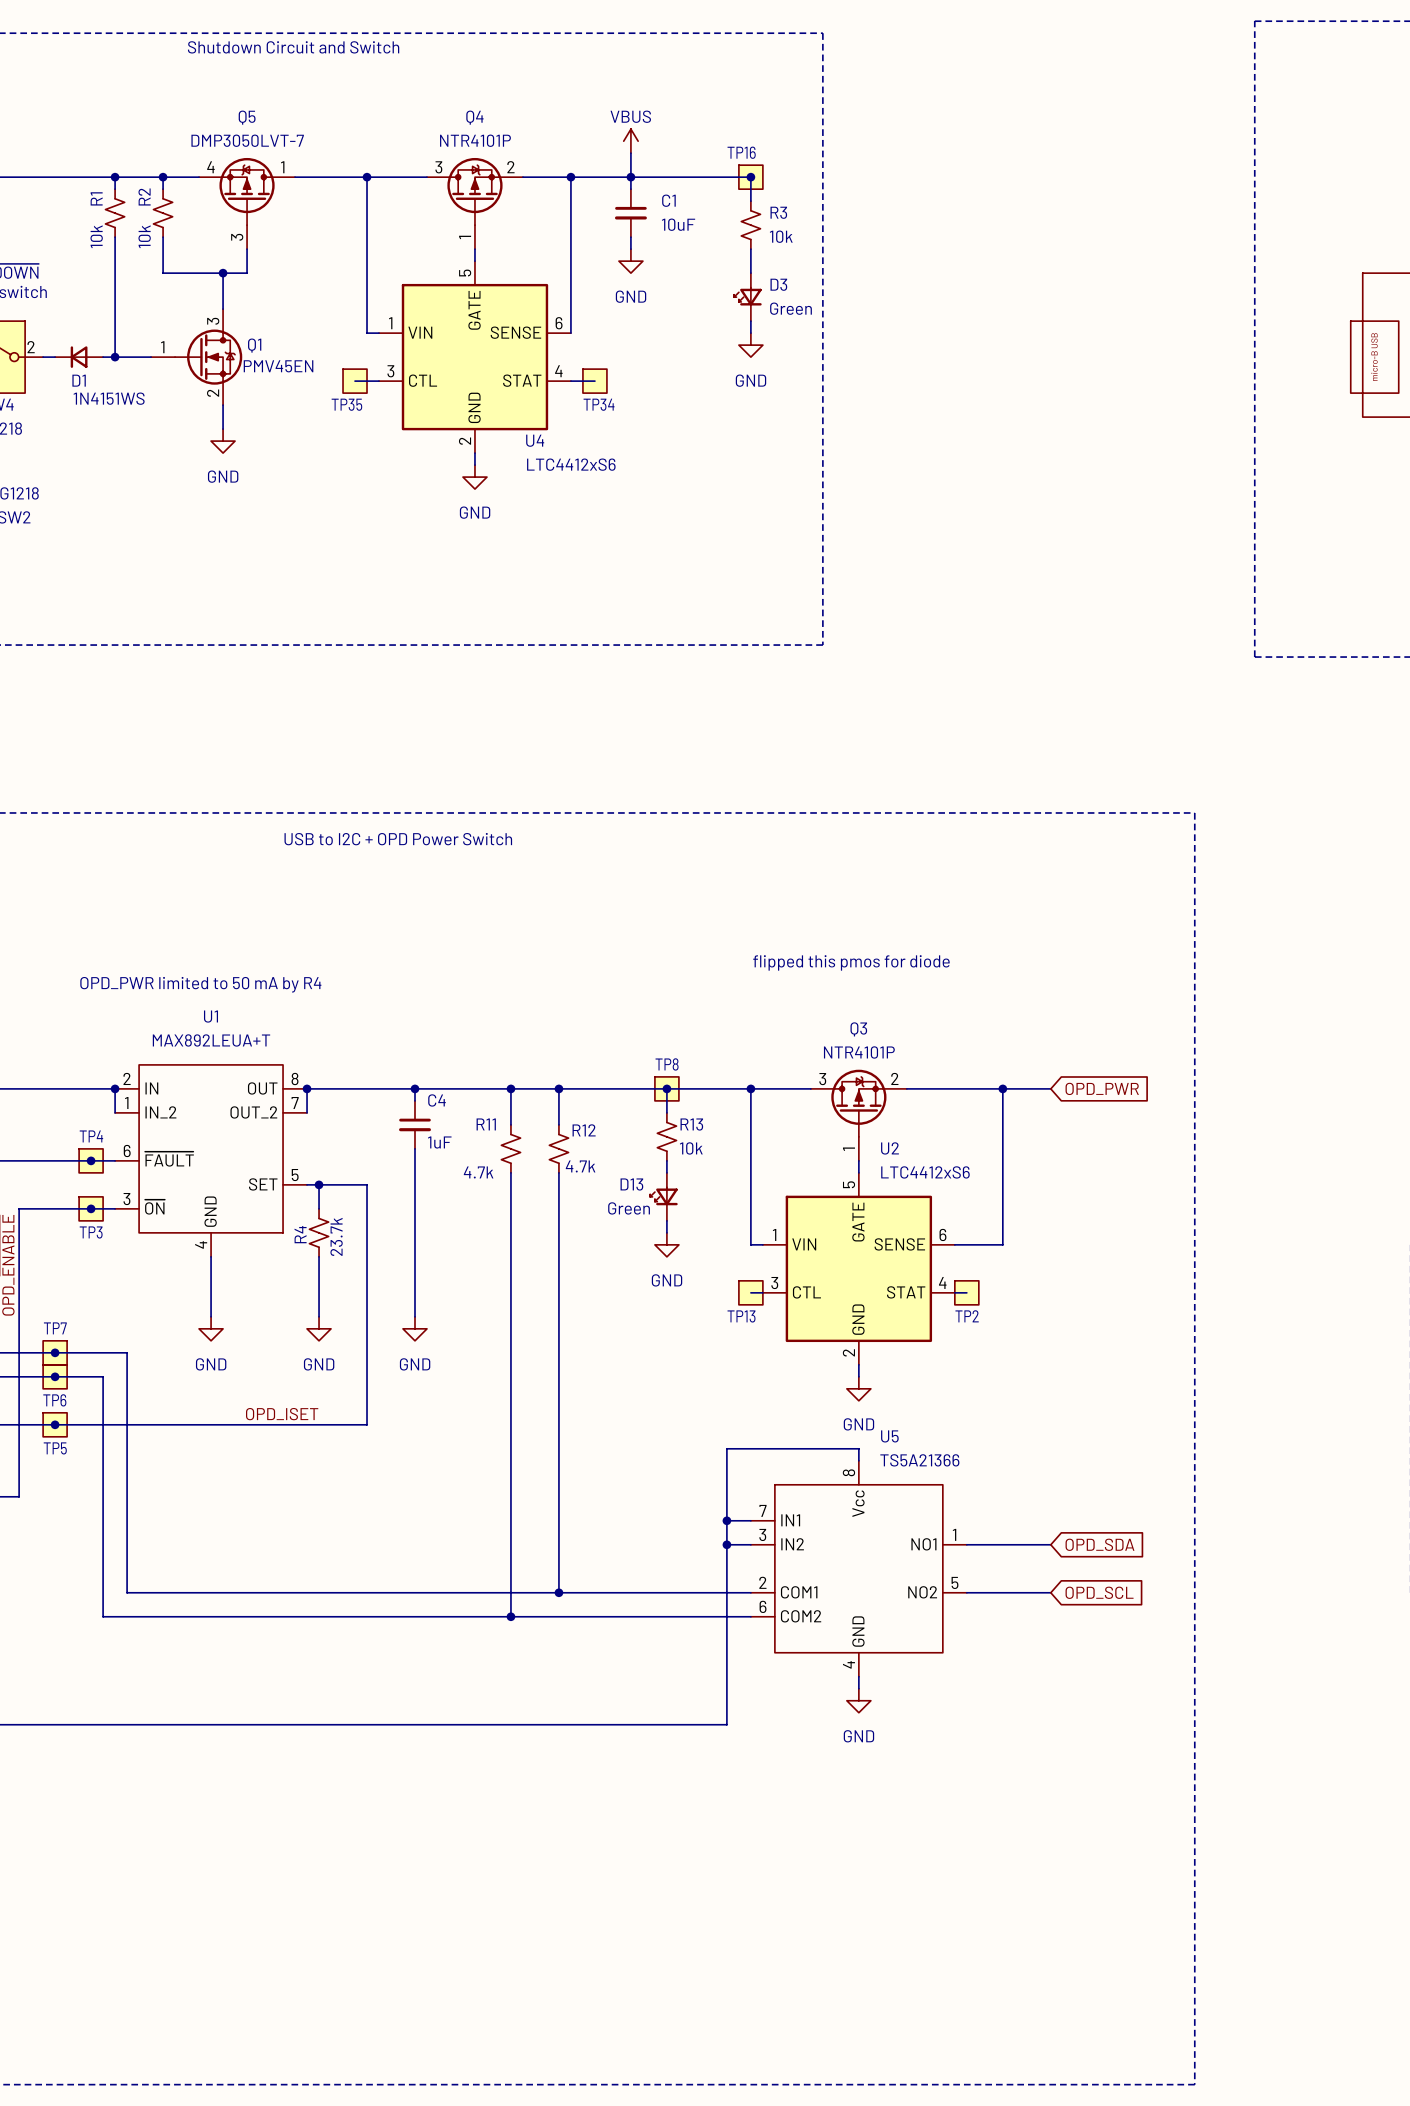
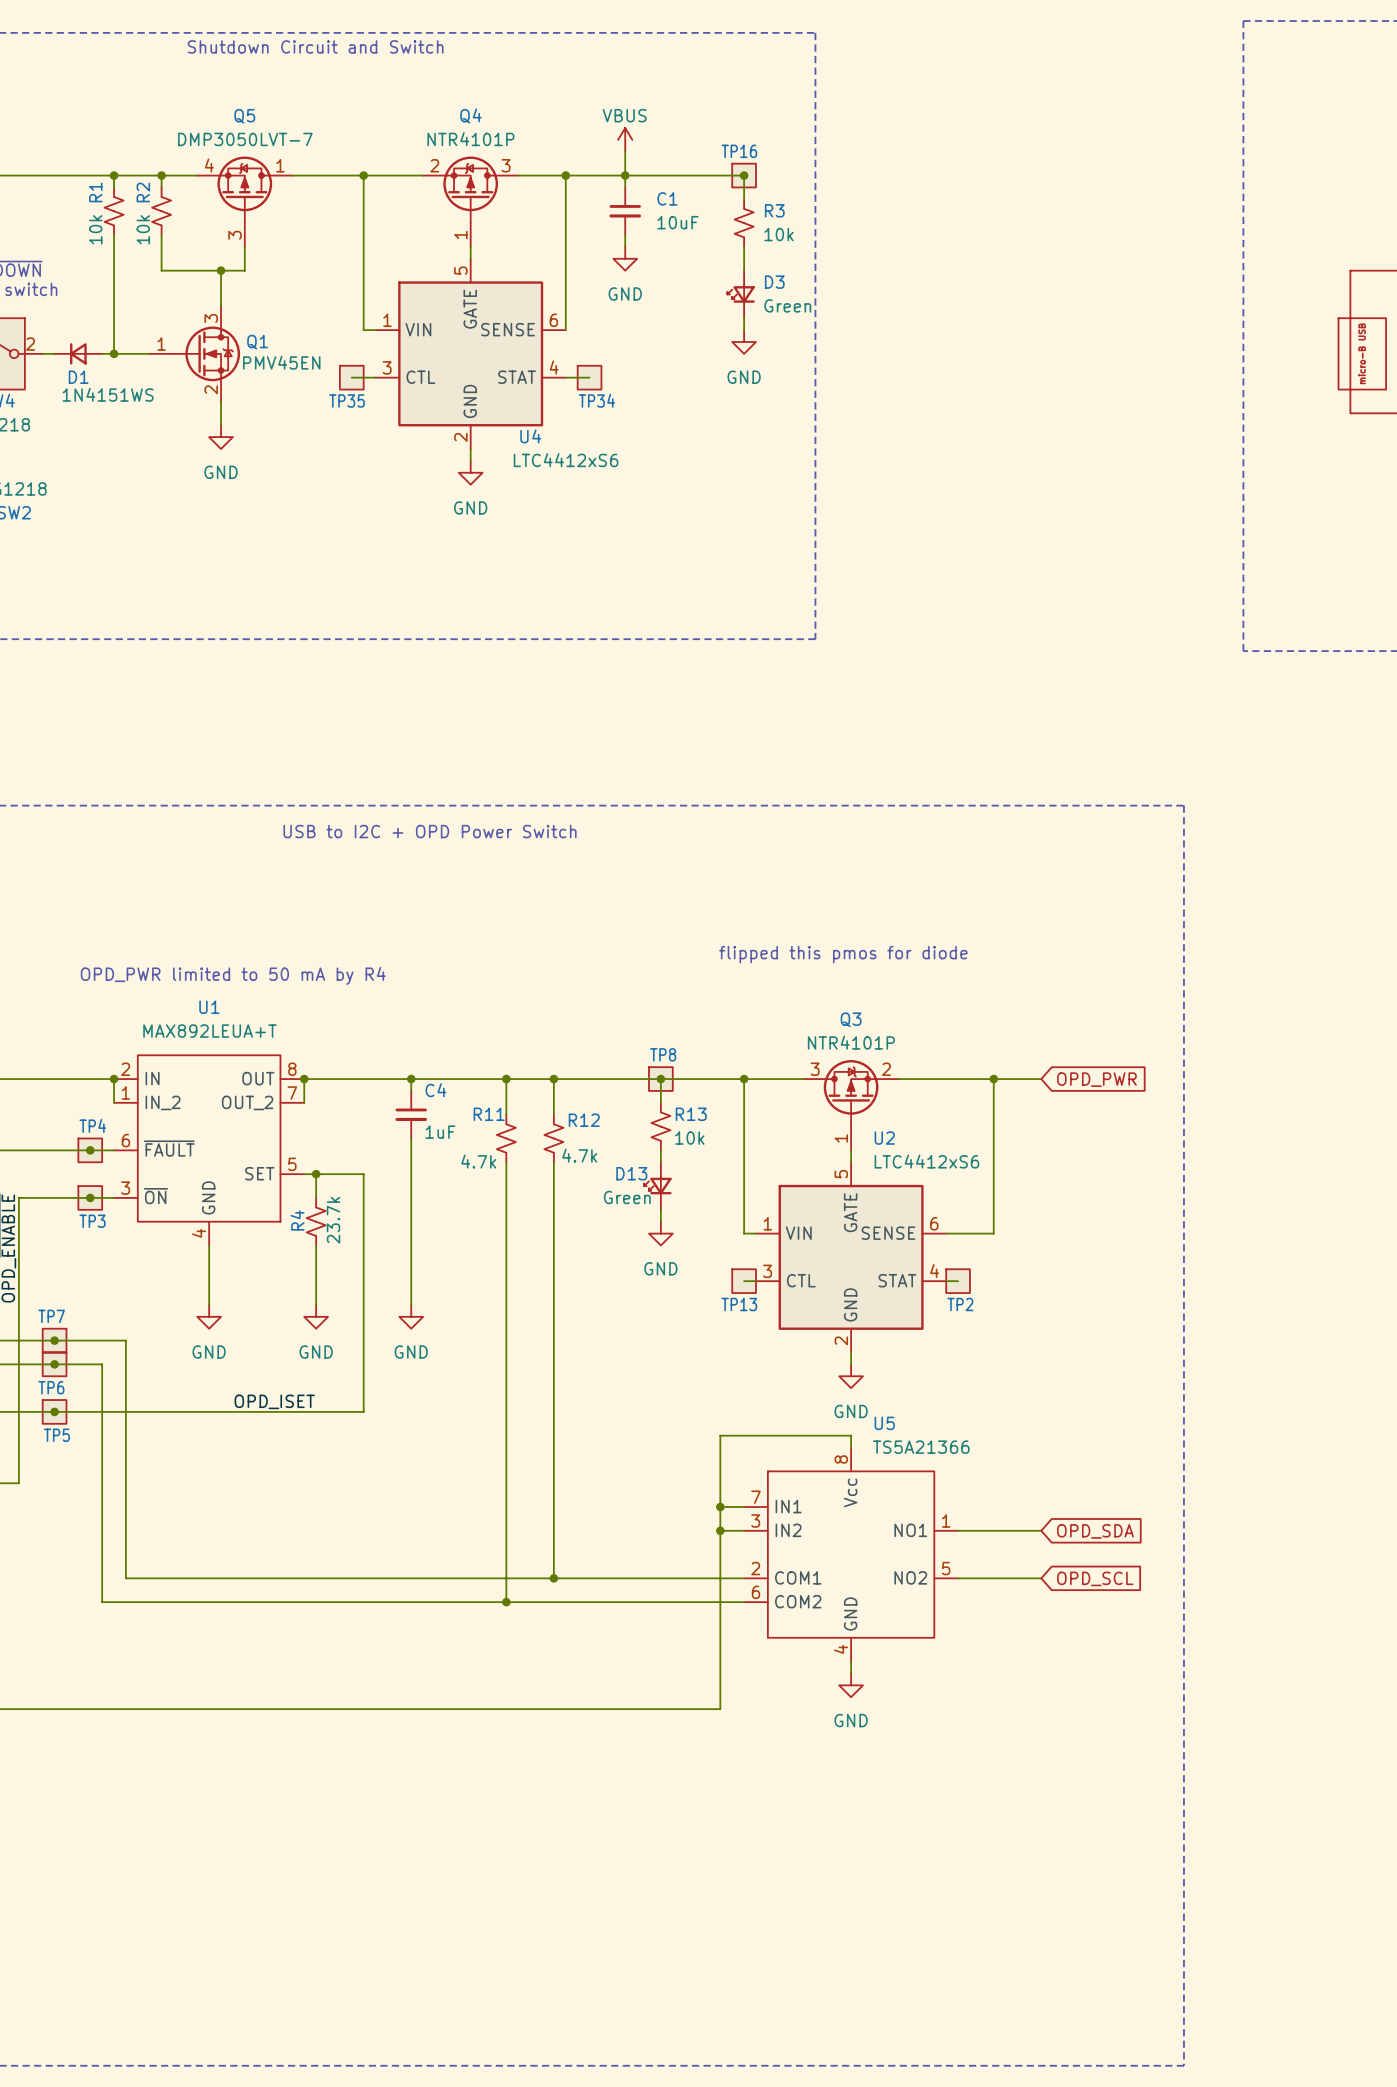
Q4 flip: as is (474, 191) -> left-right (470, 189)

